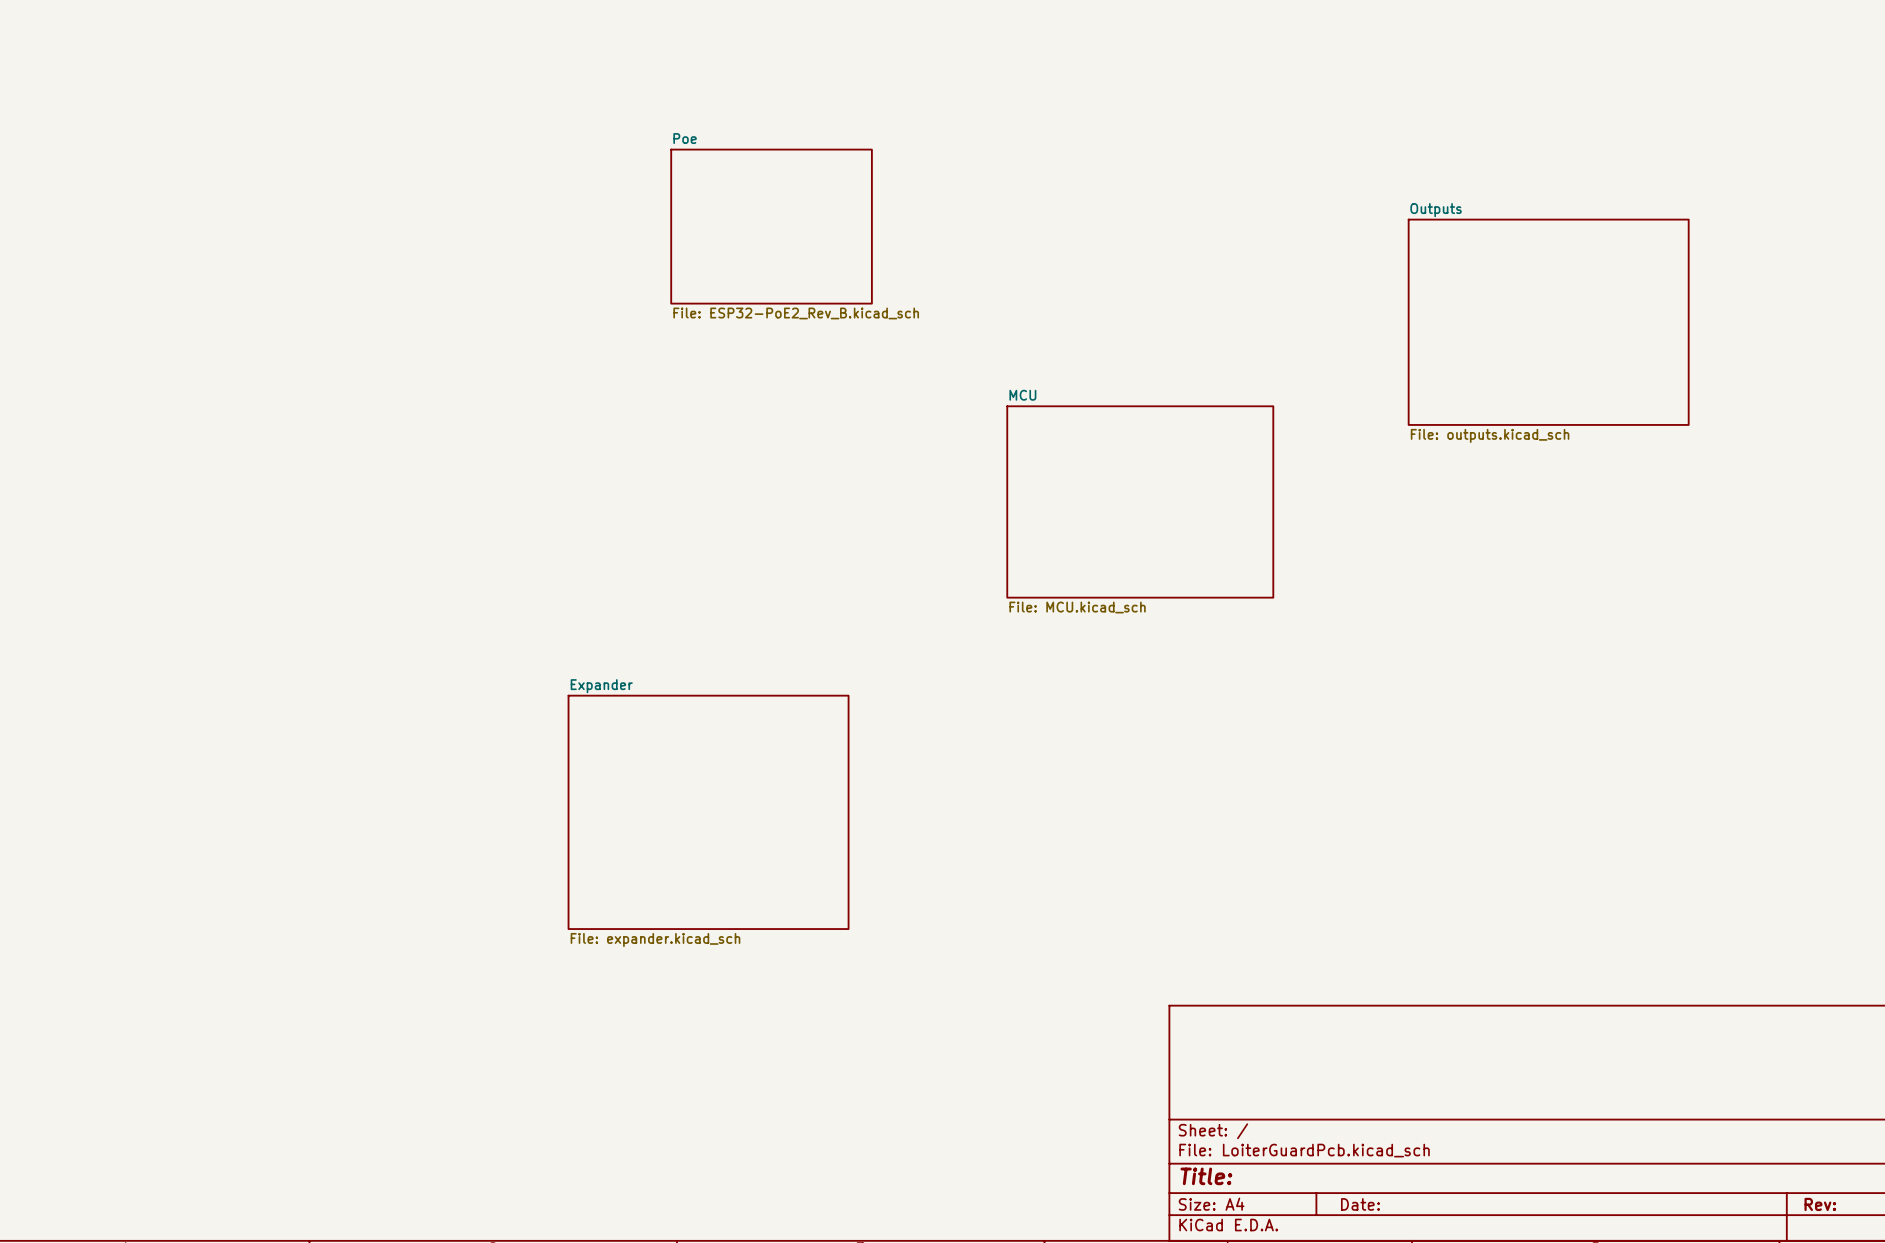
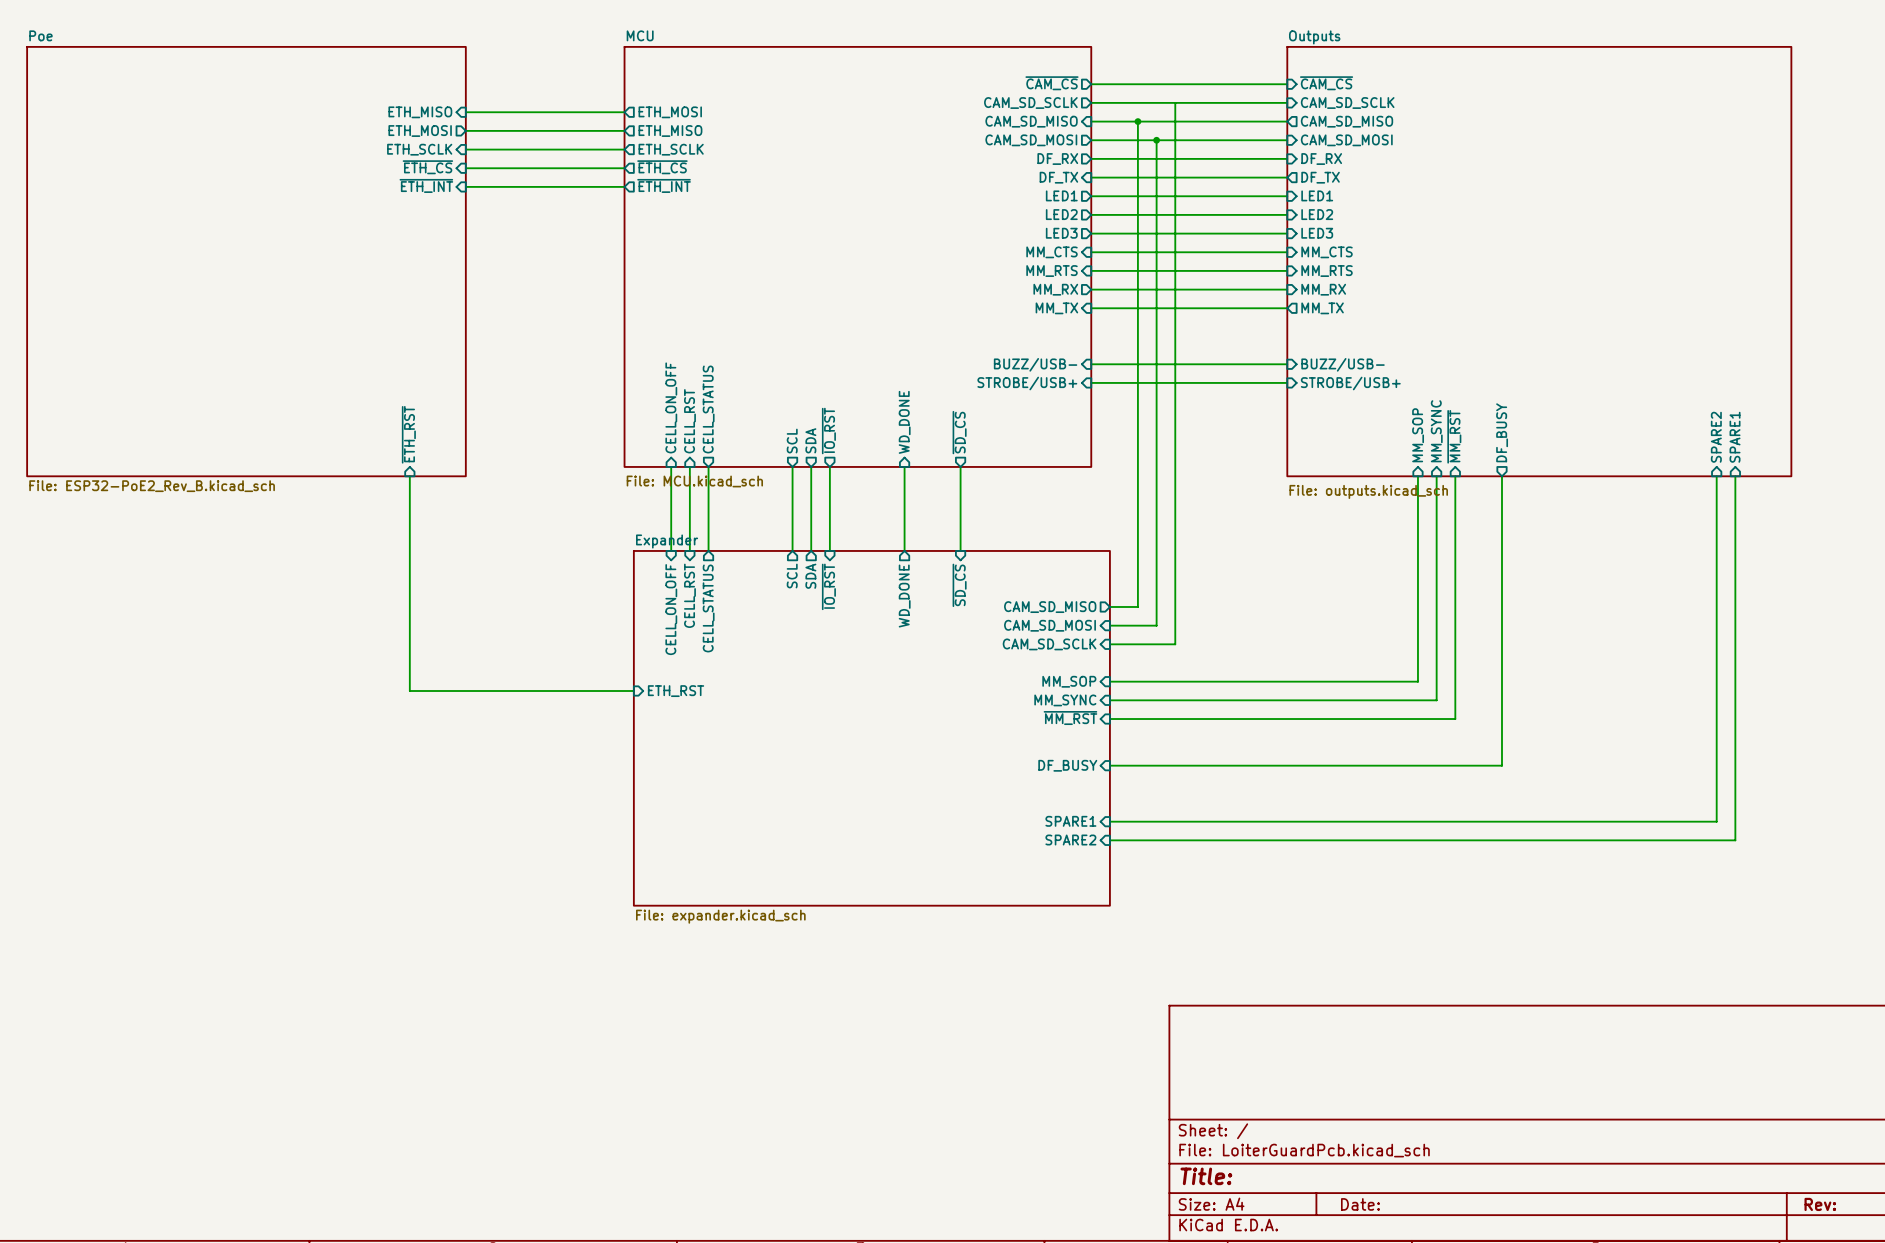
sheet pin: none -> ~{CAM_CS} (1052, 83)
sheet pin: none -> ~{CAM_CS} (1326, 83)
wire: none -> (1091, 84) (1287, 84)
wire: none -> (1091, 102) (1287, 102)
wire: none -> (1175, 102) (1175, 644) (1109, 644)
sheet pin: none -> CAM_SD_SCLK (1030, 103)
sheet pin: none -> CAM_SD_SCLK (1347, 103)
sheet pin: none -> ETH_MISO (420, 112)
wire: none -> (465, 112) (624, 112)
sheet pin: none -> ETH_MOSI (670, 112)
sheet pin: none -> CAM_SD_MISO (1031, 121)
wire: none -> (1091, 121) (1287, 121)
wire: none -> (1137, 121) (1137, 606) (1109, 606)
junction: none -> (1137, 121)
sheet pin: none -> CAM_SD_MISO (1347, 121)
wire: none -> (465, 130) (624, 130)
sheet pin: none -> ETH_MOSI (420, 131)
sheet pin: none -> ETH_MISO (670, 131)
sheet pin: none -> CAM_SD_MOSI (1031, 140)
wire: none -> (1091, 140) (1287, 140)
wire: none -> (1156, 140) (1156, 625) (1109, 625)
junction: none -> (1156, 140)
sheet pin: none -> CAM_SD_MOSI (1346, 140)
sheet pin: none -> ETH_SCLK (419, 149)
wire: none -> (465, 149) (624, 149)
sheet pin: none -> ETH_SCLK (671, 149)
wire: none -> (1091, 158) (1287, 158)
sheet pin: none -> DF_RX (1057, 159)
sheet pin: none -> DF_RX (1321, 159)
sheet pin: none -> ~{ETH_CS} (427, 167)
sheet pin: none -> ~{ETH_CS} (662, 167)
wire: none -> (465, 168) (624, 168)
sheet pin: none -> DF_TX (1058, 177)
wire: none -> (1091, 177) (1287, 177)
sheet pin: none -> DF_TX (1320, 177)
sheet pin: none -> ~{ETH_INT} (426, 185)
sheet pin: none -> ~{ETH_INT} (664, 185)
wire: none -> (465, 186) (624, 186)
sheet pin: none -> LED1 (1061, 195)
sheet pin: none -> LED1 (1317, 195)
wire: none -> (1091, 196) (1287, 196)
sheet pin: none -> LED2 (1061, 214)
wire: none -> (1091, 214) (1287, 214)
sheet pin: none -> LED2 (1317, 214)
sheet Poe: File: ESP32-PoE2_Rev_B.kicad_sch (771, 226) -> none
sheet pin: none -> LED3 (1061, 233)
wire: none -> (1091, 233) (1287, 233)
sheet pin: none -> LED3 (1317, 233)
sheet pin: none -> MM_CTS (1052, 252)
wire: none -> (1091, 252) (1287, 252)
sheet pin: none -> MM_CTS (1327, 252)
sheet MCU: none -> File: MCU.kicad_sch (857, 256)
sheet Poe: none -> File: ESP32-PoE2_Rev_B.kicad_sch (246, 261)
sheet Outputs: none -> File: outputs.kicad_sch (1539, 261)
wire: none -> (1091, 270) (1287, 270)
sheet pin: none -> MM_RTS (1052, 271)
sheet pin: none -> MM_RTS (1327, 271)
sheet pin: none -> MM_RX (1055, 289)
wire: none -> (1091, 289) (1287, 289)
sheet pin: none -> MM_RX (1323, 289)
sheet pin: none -> MM_TX (1056, 308)
wire: none -> (1091, 308) (1287, 308)
sheet pin: none -> MM_TX (1322, 308)
sheet Outputs: File: outputs.kicad_sch (1548, 322) -> none
sheet pin: none -> BUZZ/USB- (1035, 364)
wire: none -> (1091, 364) (1287, 364)
sheet pin: none -> BUZZ/USB- (1343, 364)
wire: none -> (1091, 382) (1287, 382)
sheet pin: none -> STROBE/USB+ (1027, 383)
sheet pin: none -> STROBE/USB+ (1350, 383)
sheet pin: none -> CELL_ON_OFF (671, 407)
sheet pin: none -> CELL_STATUS (708, 409)
sheet pin: none -> CELL_RST (689, 421)
sheet pin: none -> WD_DONE (904, 422)
sheet pin: none -> ~{IO_RST} (828, 431)
sheet pin: none -> MM_SYNC (1436, 431)
sheet pin: none -> ~{SD_CS} (959, 432)
sheet pin: none -> DF_BUSY (1502, 432)
sheet pin: none -> ~{ETH_RST} (408, 434)
sheet pin: none -> MM_SOP (1418, 435)
sheet pin: none -> ~{MM_RST} (1454, 436)
sheet pin: none -> SPARE2 (1716, 437)
sheet pin: none -> SPARE1 (1735, 437)
sheet pin: none -> SDA (810, 440)
sheet pin: none -> SCL (792, 441)
wire: none -> (671, 466) (671, 550)
wire: none -> (689, 466) (689, 550)
wire: none -> (708, 466) (708, 550)
wire: none -> (792, 466) (792, 550)
wire: none -> (811, 466) (811, 550)
wire: none -> (829, 466) (829, 550)
wire: none -> (904, 466) (904, 550)
wire: none -> (960, 466) (960, 550)
wire: none -> (409, 476) (409, 691) (633, 691)
wire: none -> (1417, 476) (1417, 681) (1109, 681)
wire: none -> (1436, 476) (1436, 700) (1109, 700)
wire: none -> (1455, 476) (1455, 719) (1109, 719)
wire: none -> (1501, 476) (1501, 765) (1109, 765)
wire: none -> (1716, 476) (1716, 821) (1109, 821)
wire: none -> (1735, 476) (1735, 840) (1109, 840)
sheet MCU: File: MCU.kicad_sch (1140, 501) -> none
sheet pin: none -> SCL (792, 576)
sheet pin: none -> SDA (810, 576)
sheet pin: none -> ~{SD_CS} (959, 585)
sheet pin: none -> ~{IO_RST} (828, 586)
sheet pin: none -> CELL_RST (689, 595)
sheet pin: none -> WD_DONE (904, 596)
sheet pin: none -> CAM_SD_MISO (1050, 607)
sheet pin: none -> CELL_STATUS (708, 608)
sheet pin: none -> CELL_ON_OFF (671, 609)
sheet pin: none -> CAM_SD_MOSI (1050, 625)
sheet pin: none -> CAM_SD_SCLK (1049, 644)
sheet pin: none -> MM_SOP (1069, 681)
sheet pin: none -> ETH_RST (676, 691)
sheet pin: none -> MM_SYNC (1065, 700)
sheet pin: none -> ~{MM_RST} (1070, 718)
sheet Expander: none -> File: expander.kicad_sch (871, 728)
sheet pin: none -> DF_BUSY (1067, 765)
sheet Expander: File: expander.kicad_sch (708, 812) -> none
sheet pin: none -> SPARE1 (1070, 821)
sheet pin: none -> SPARE2 (1070, 840)

